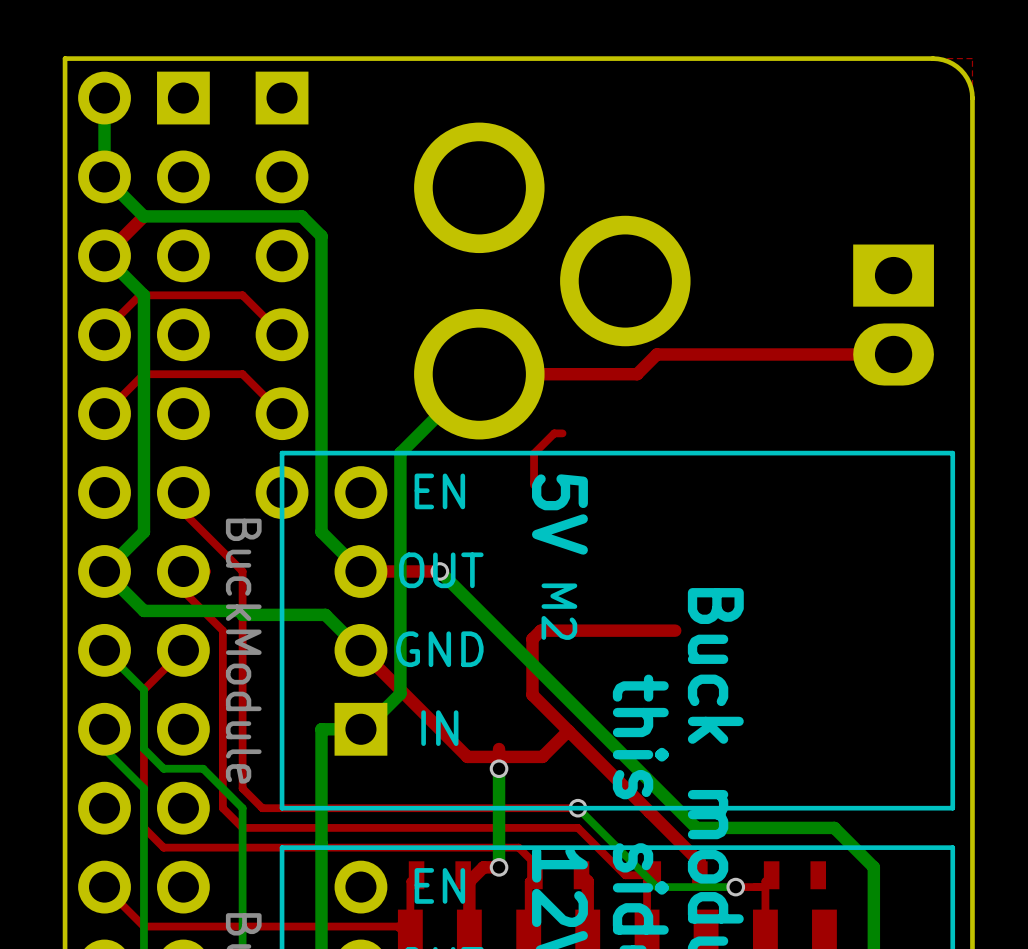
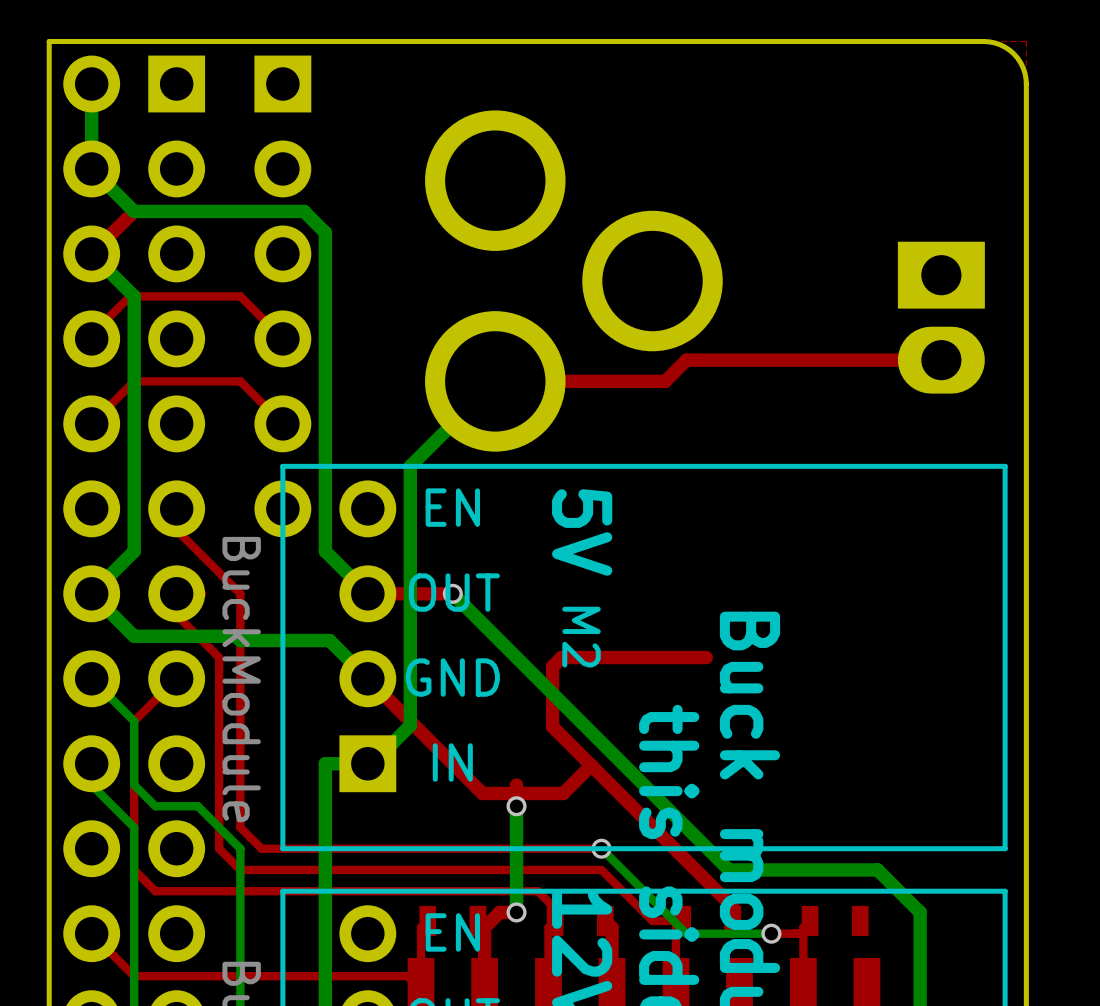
top track: (562, 433) (554, 433) (534, 453) (534, 485) -> none

